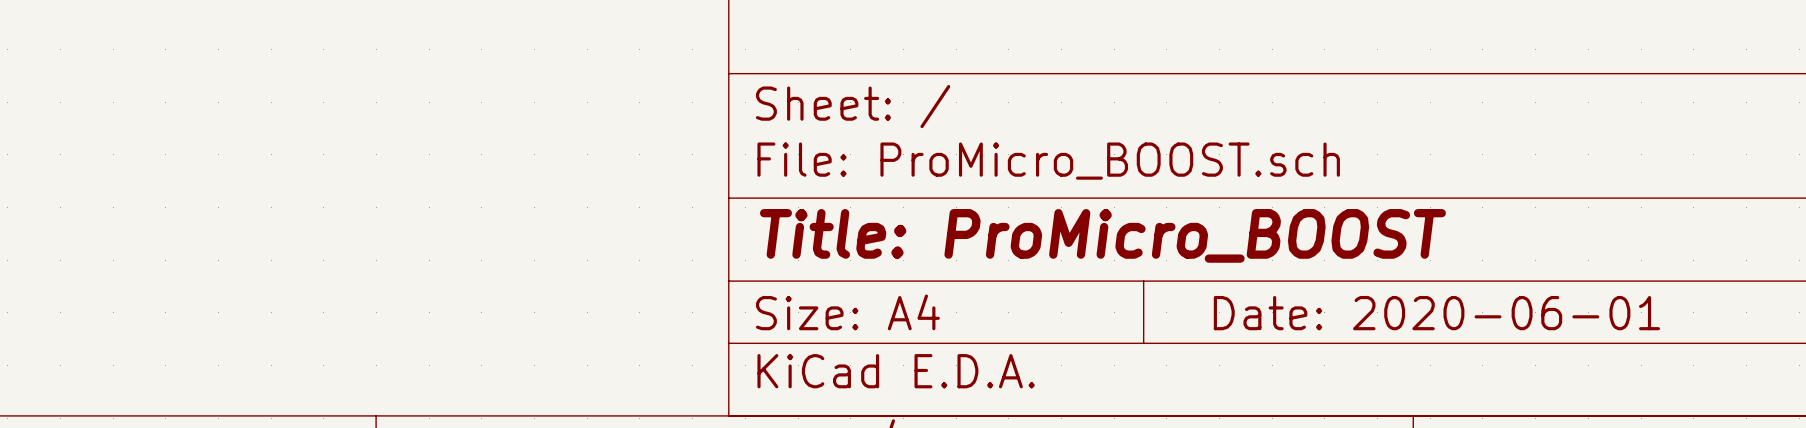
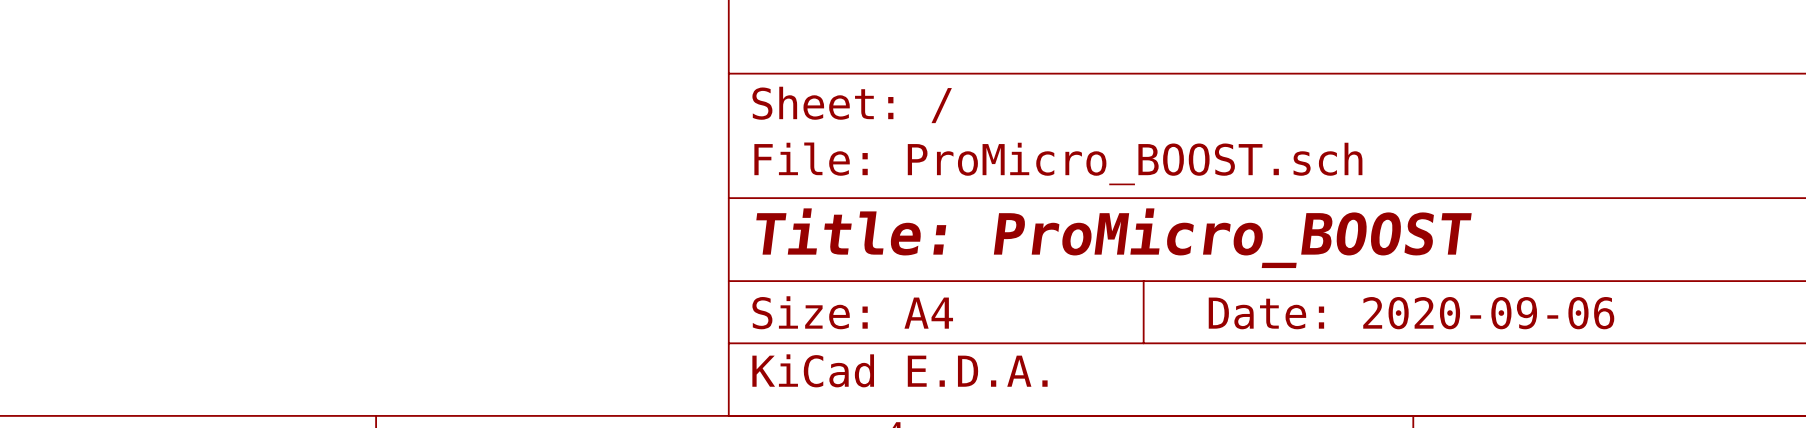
title block: Date: 2020-06-01 (1436, 313) -> Date: 2020-09-06 (1411, 313)

